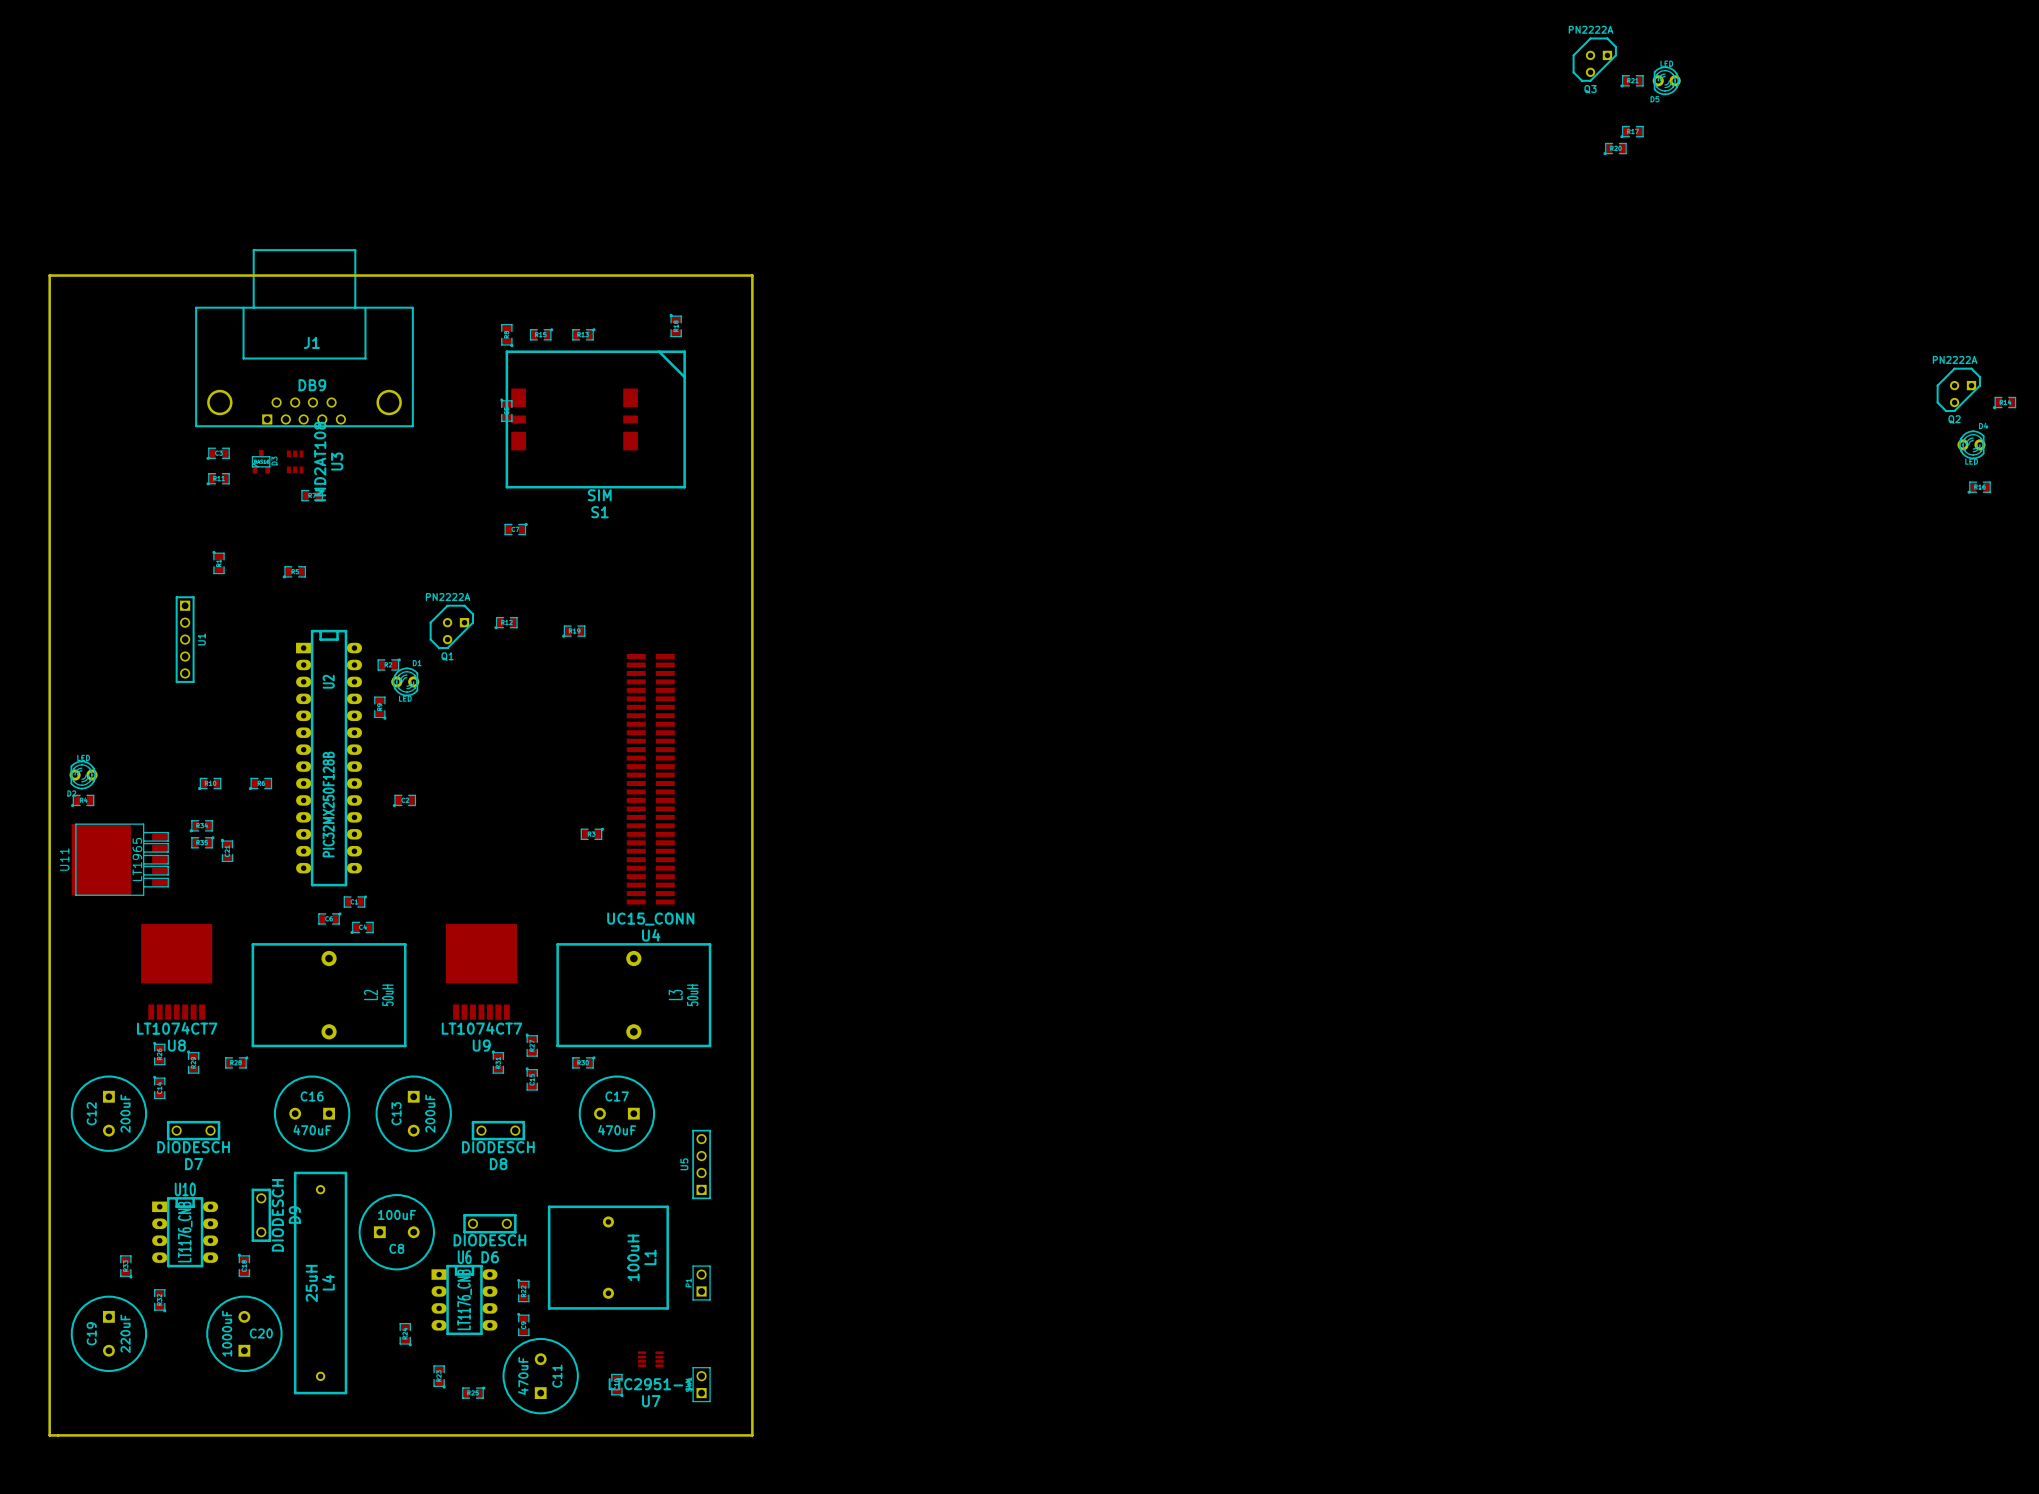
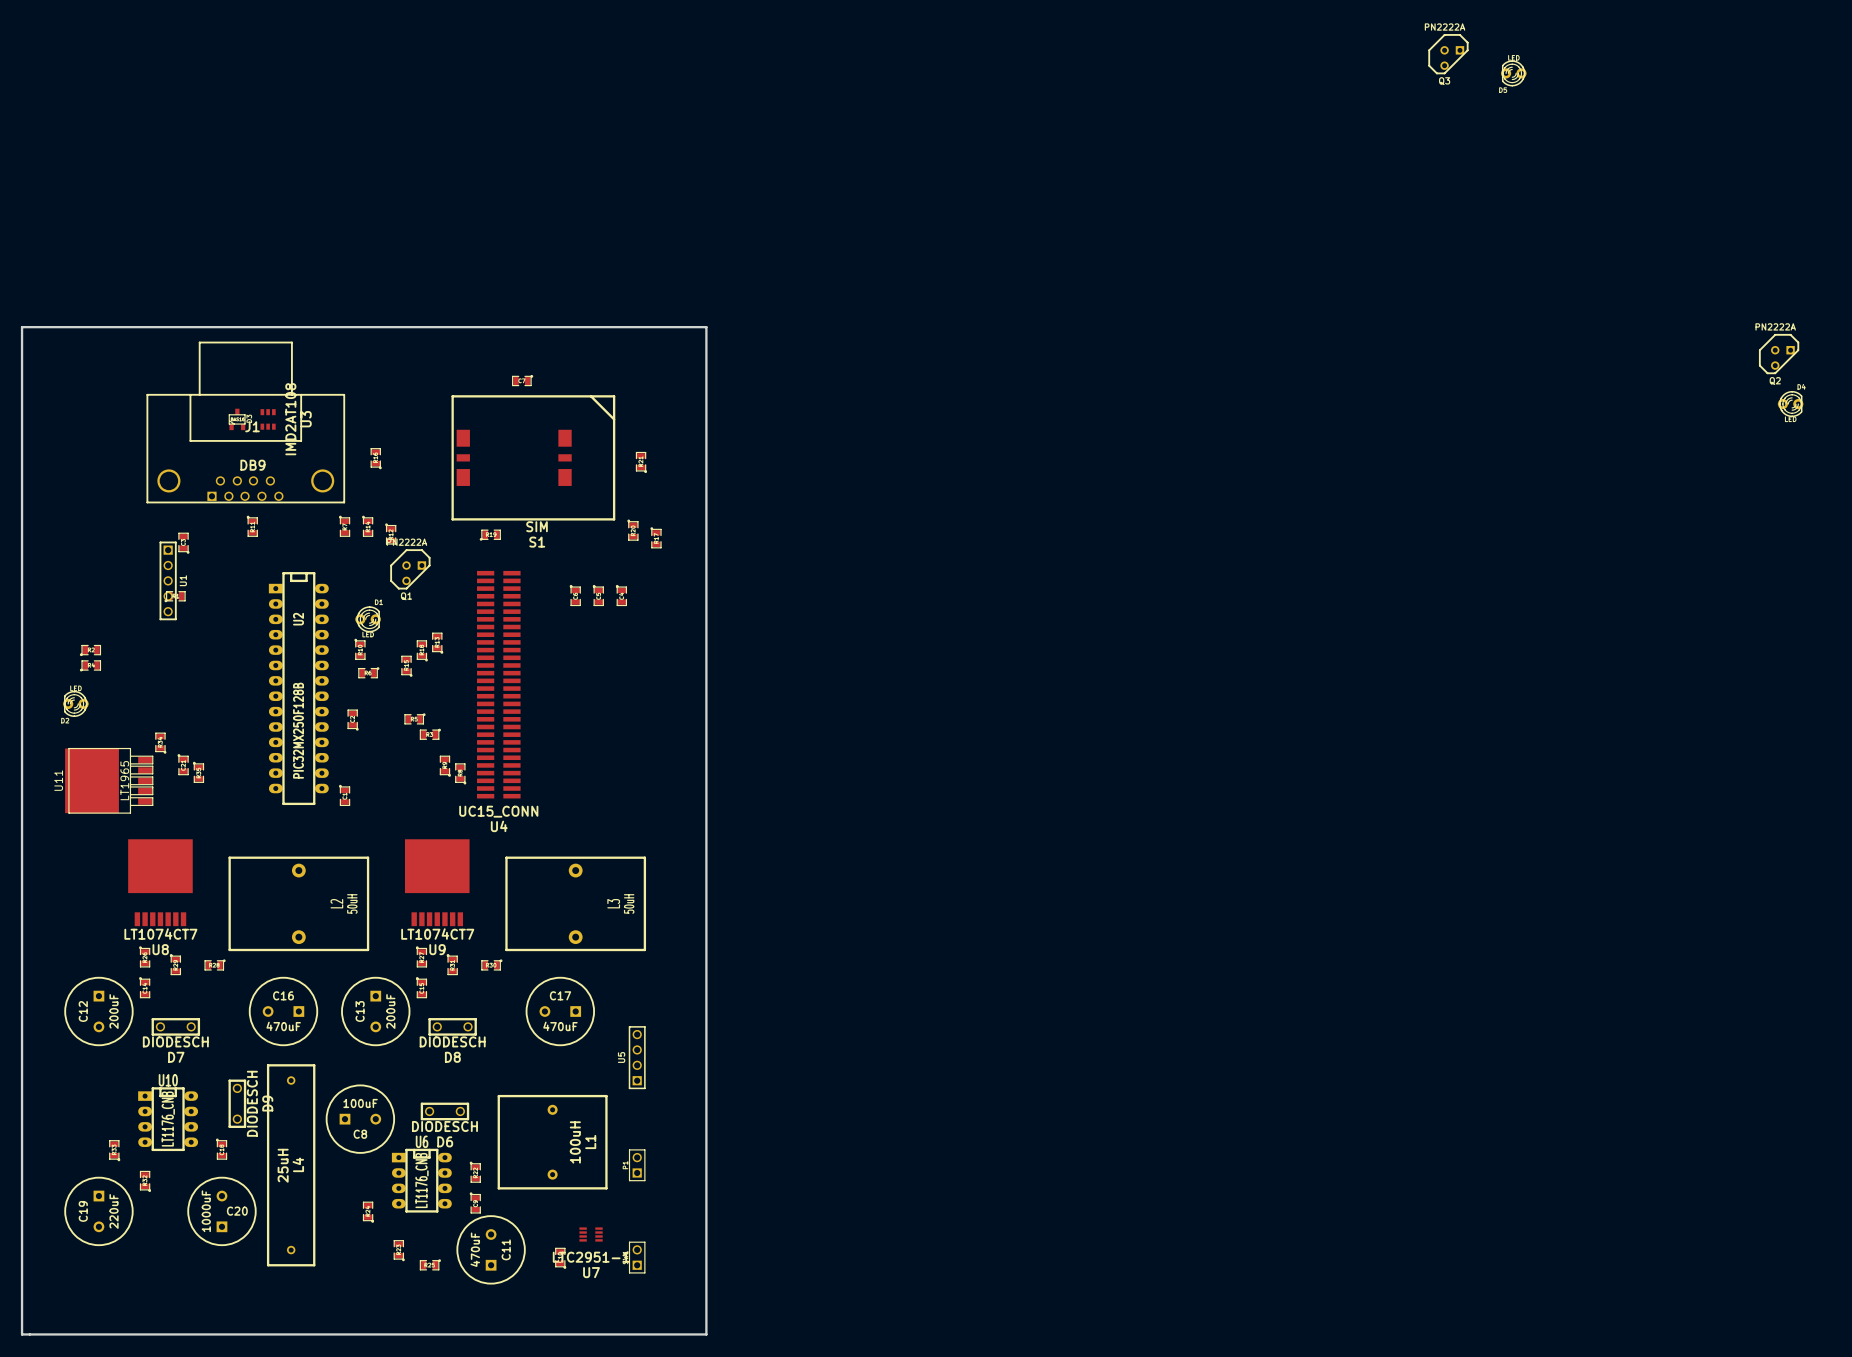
part rotation: 0° (1632, 81) -> 90° counterclockwise (641, 462)
part position: (1632, 81) -> (641, 462)
part rotation: 0° (1632, 132) -> 90° clockwise (656, 537)
part position: (1632, 132) -> (656, 537)
part rotation: 0° (1615, 148) -> 90° clockwise (632, 530)
part position: (1615, 148) -> (632, 530)
board edge: (49, 275) (49, 1435) (752, 1435) (752, 275) (49, 275) -> (22, 327) (22, 1334) (706, 1334) (706, 327) (22, 327)
part rotation: 0° (675, 325) -> 180° (422, 650)
part position: (675, 325) -> (422, 650)
part rotation: 0° (541, 334) -> 90° clockwise (406, 666)
part position: (541, 334) -> (406, 666)
part rotation: 0° (583, 334) -> 90° clockwise (437, 643)
part position: (583, 334) -> (437, 643)
part position: (507, 335) -> (460, 773)
J1 position: (304, 338) -> (245, 422)
part rotation: 0° (2004, 402) -> 90° clockwise (367, 526)
part position: (2004, 402) -> (367, 526)
part position: (506, 410) -> (598, 595)
S1 position: (595, 419) -> (533, 457)
part rotation: 0° (218, 453) -> 90° counterclockwise (183, 543)
part position: (218, 453) -> (183, 543)
part rotation: 0° (218, 479) -> 90° clockwise (252, 526)
part position: (218, 479) -> (252, 526)
part rotation: 0° (1979, 487) -> 90° counterclockwise (376, 458)
part position: (1979, 487) -> (376, 458)
part rotation: 0° (312, 495) -> 90° counterclockwise (344, 526)
part position: (312, 495) -> (344, 526)
part position: (516, 529) -> (522, 380)
part rotation: 0° (218, 562) -> 90° counterclockwise (175, 596)
part position: (218, 562) -> (175, 596)
part rotation: 0° (294, 572) -> 180° (414, 718)
part position: (294, 572) -> (414, 718)
part rotation: 0° (506, 623) -> 90° clockwise (390, 533)
part position: (506, 623) -> (390, 533)
part position: (573, 631) -> (490, 535)
part rotation: 0° (389, 664) -> 180° (90, 650)
part position: (389, 664) -> (90, 650)
part position: (380, 708) -> (445, 766)
U4 position: (650, 779) -> (498, 684)
part rotation: 0° (209, 783) -> 90° clockwise (359, 649)
part position: (209, 783) -> (359, 649)
part rotation: 0° (260, 783) -> 180° (368, 672)
part position: (260, 783) -> (368, 672)
part position: (82, 800) -> (90, 665)
part rotation: 0° (404, 800) -> 90° counterclockwise (353, 720)
part position: (404, 800) -> (353, 720)
part rotation: 0° (201, 826) -> 90° counterclockwise (160, 743)
part position: (201, 826) -> (160, 743)
part position: (592, 833) -> (430, 734)
part rotation: 0° (202, 842) -> 90° counterclockwise (198, 772)
part position: (202, 842) -> (198, 772)
part position: (227, 850) -> (183, 764)
part rotation: 0° (355, 901) -> 90° counterclockwise (344, 795)
part position: (355, 901) -> (344, 795)
part rotation: 0° (329, 918) -> 90° counterclockwise (575, 595)
part position: (329, 918) -> (575, 595)
part rotation: 0° (362, 927) -> 90° clockwise (621, 595)
part position: (362, 927) -> (621, 595)
part position: (531, 1045) -> (421, 956)
part position: (583, 1062) -> (491, 964)
part position: (531, 1078) -> (421, 987)

